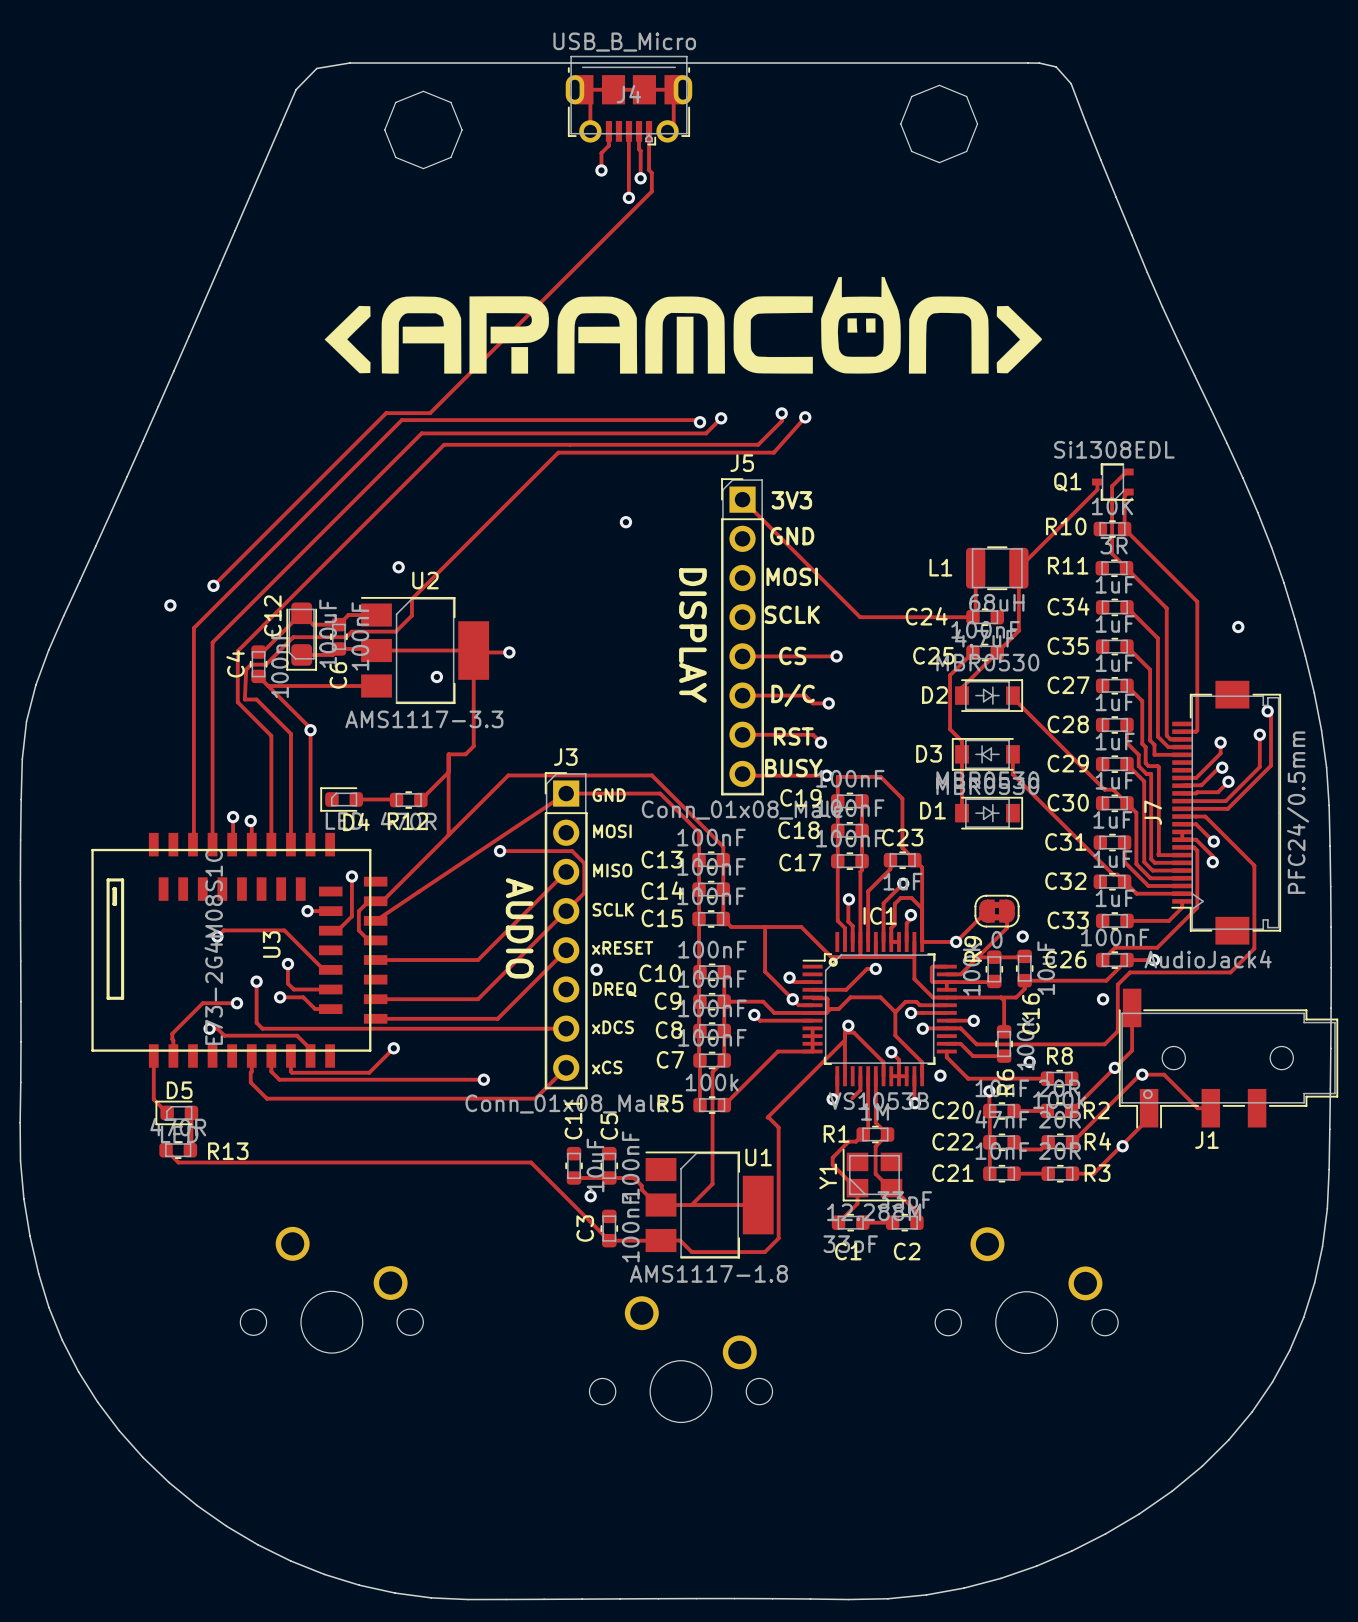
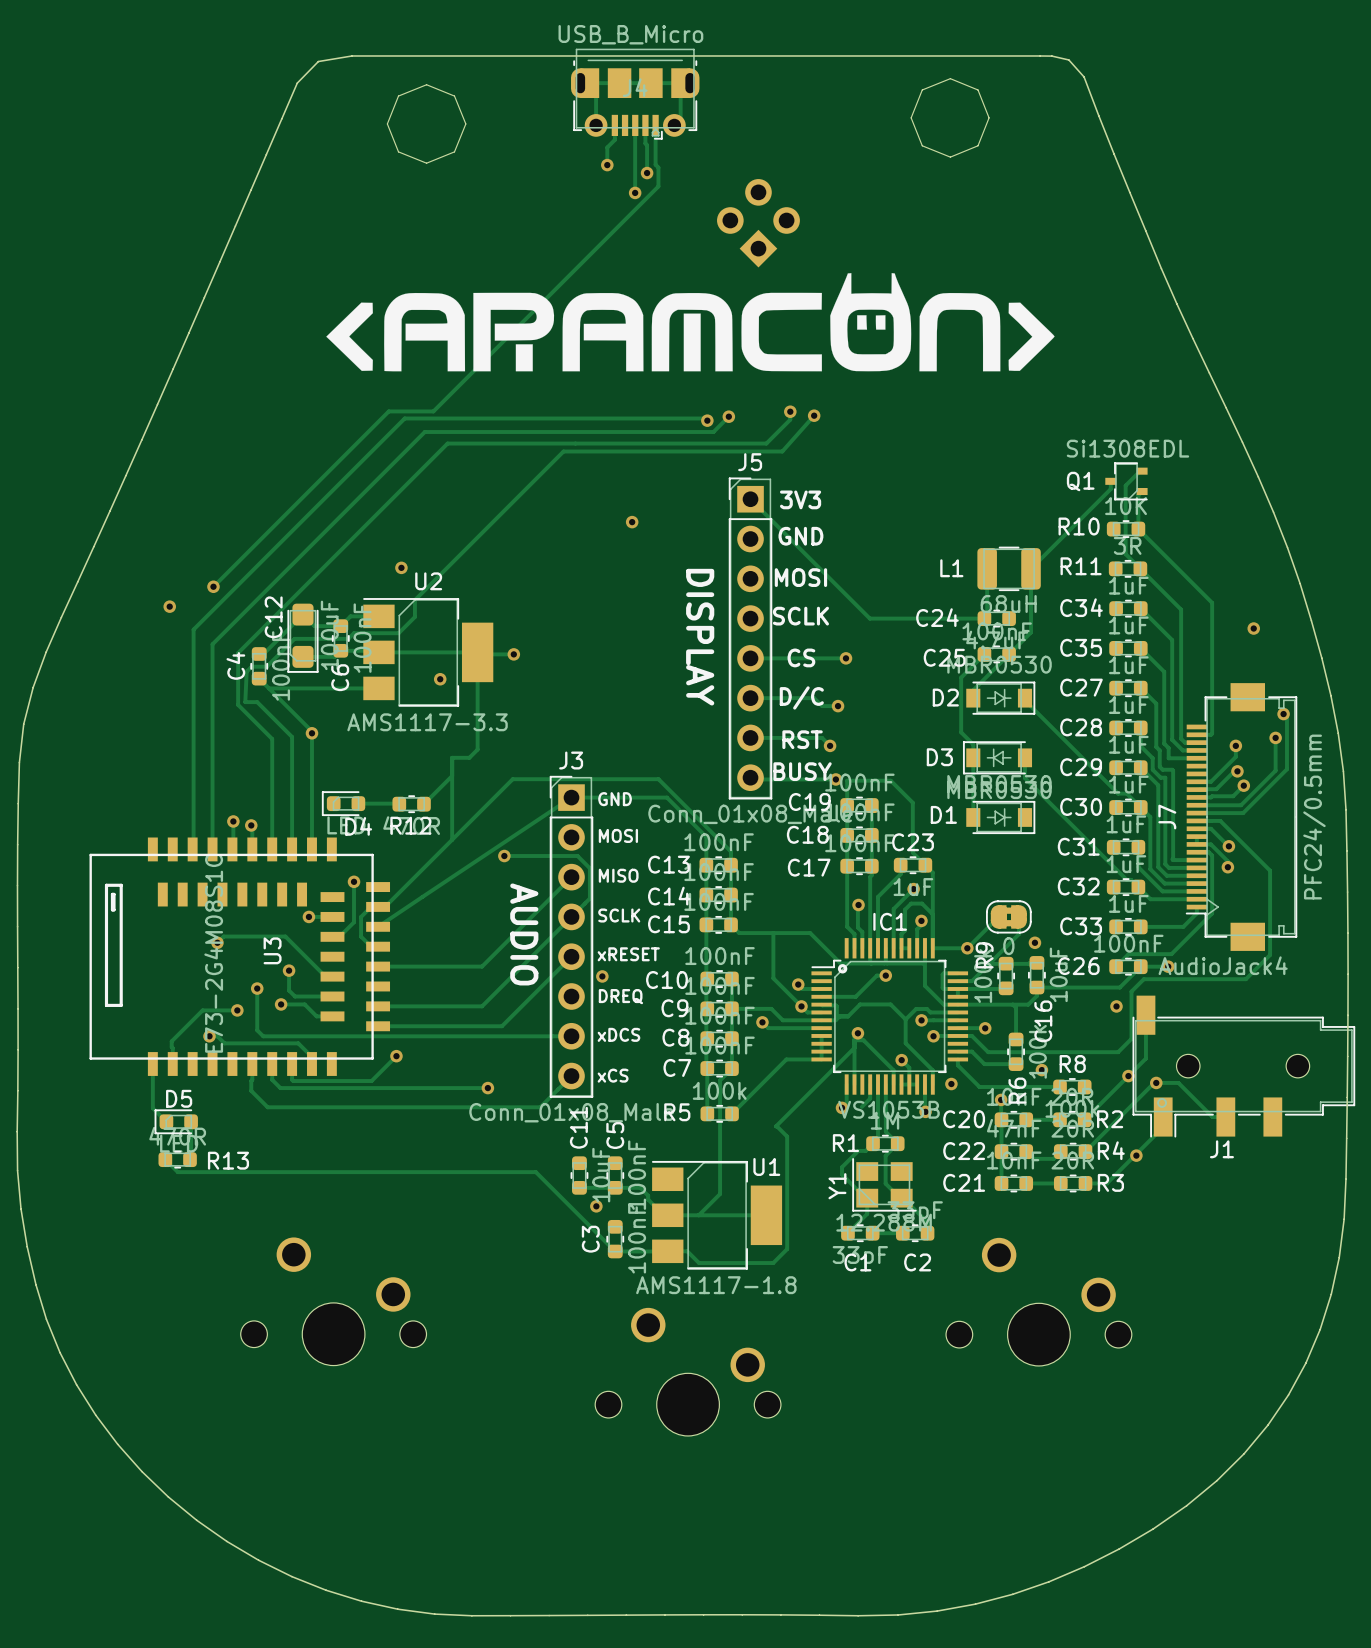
part: none -> (758, 223)

